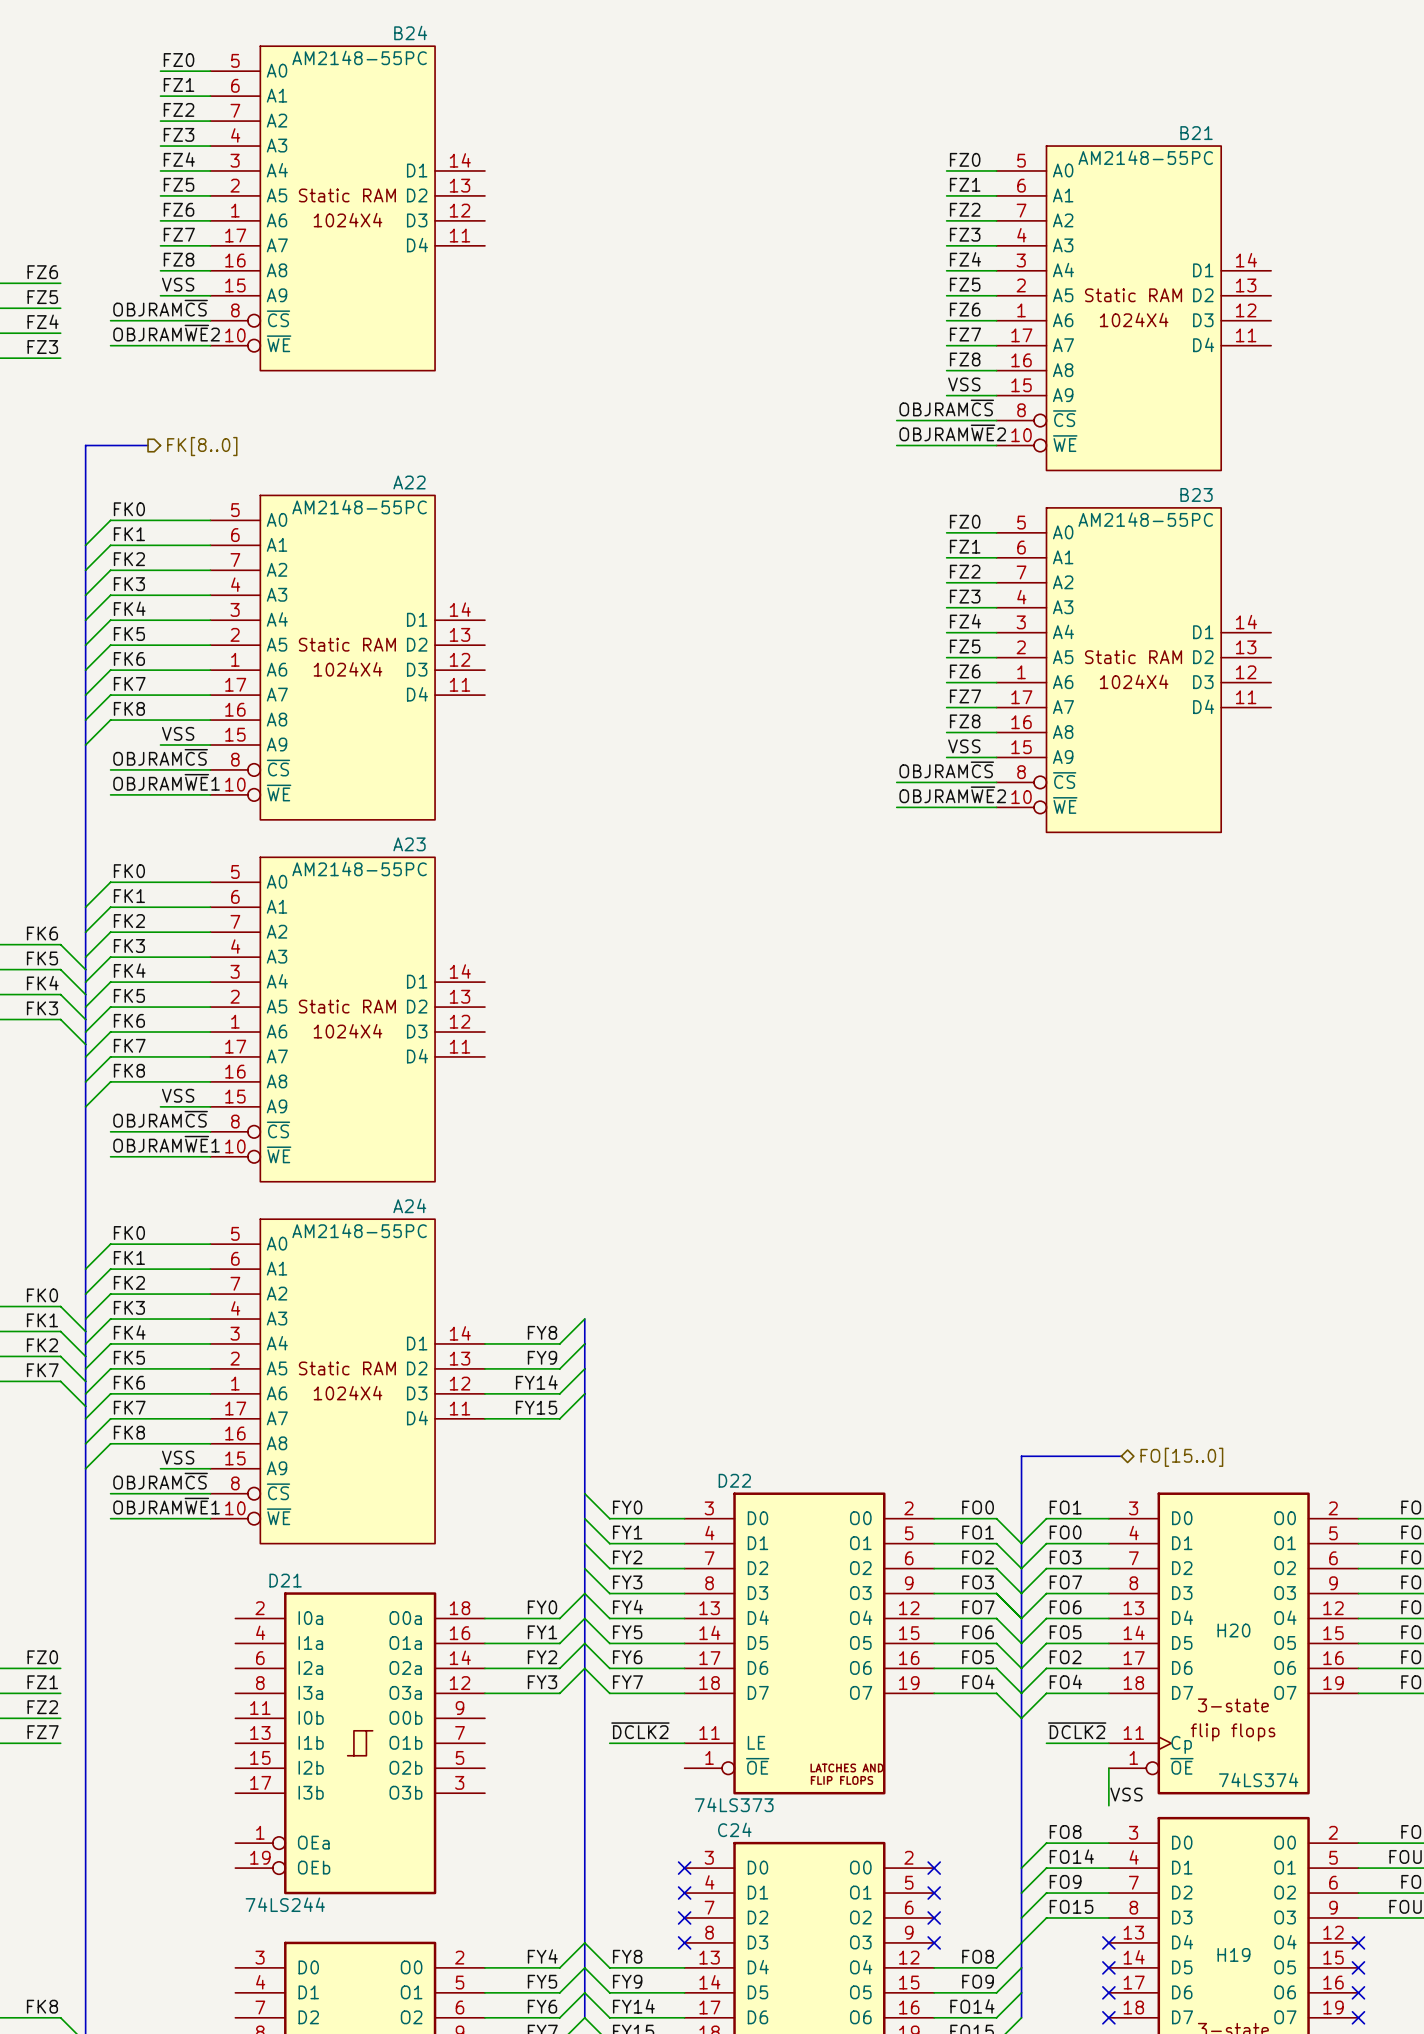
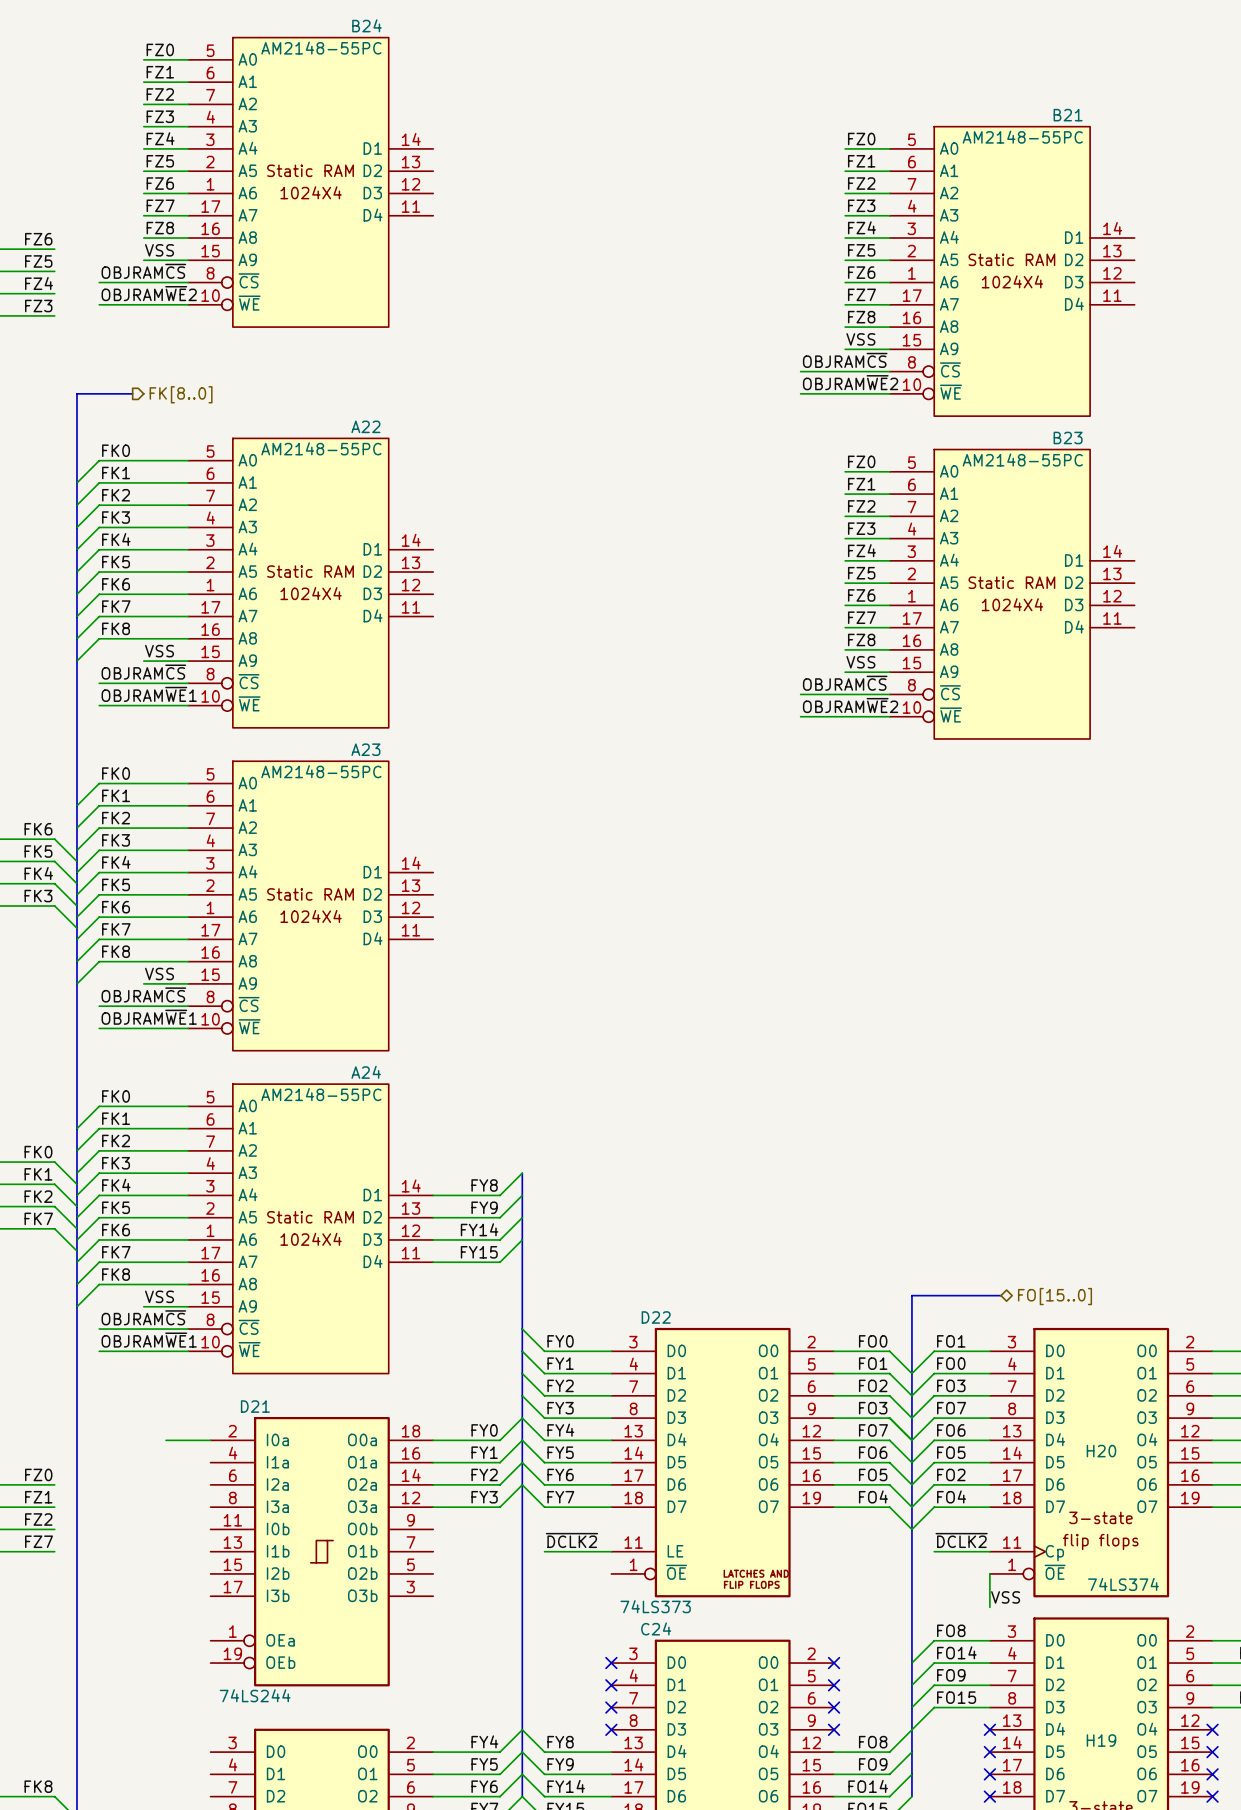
wire: none -> (166, 1440) (210, 1440)

